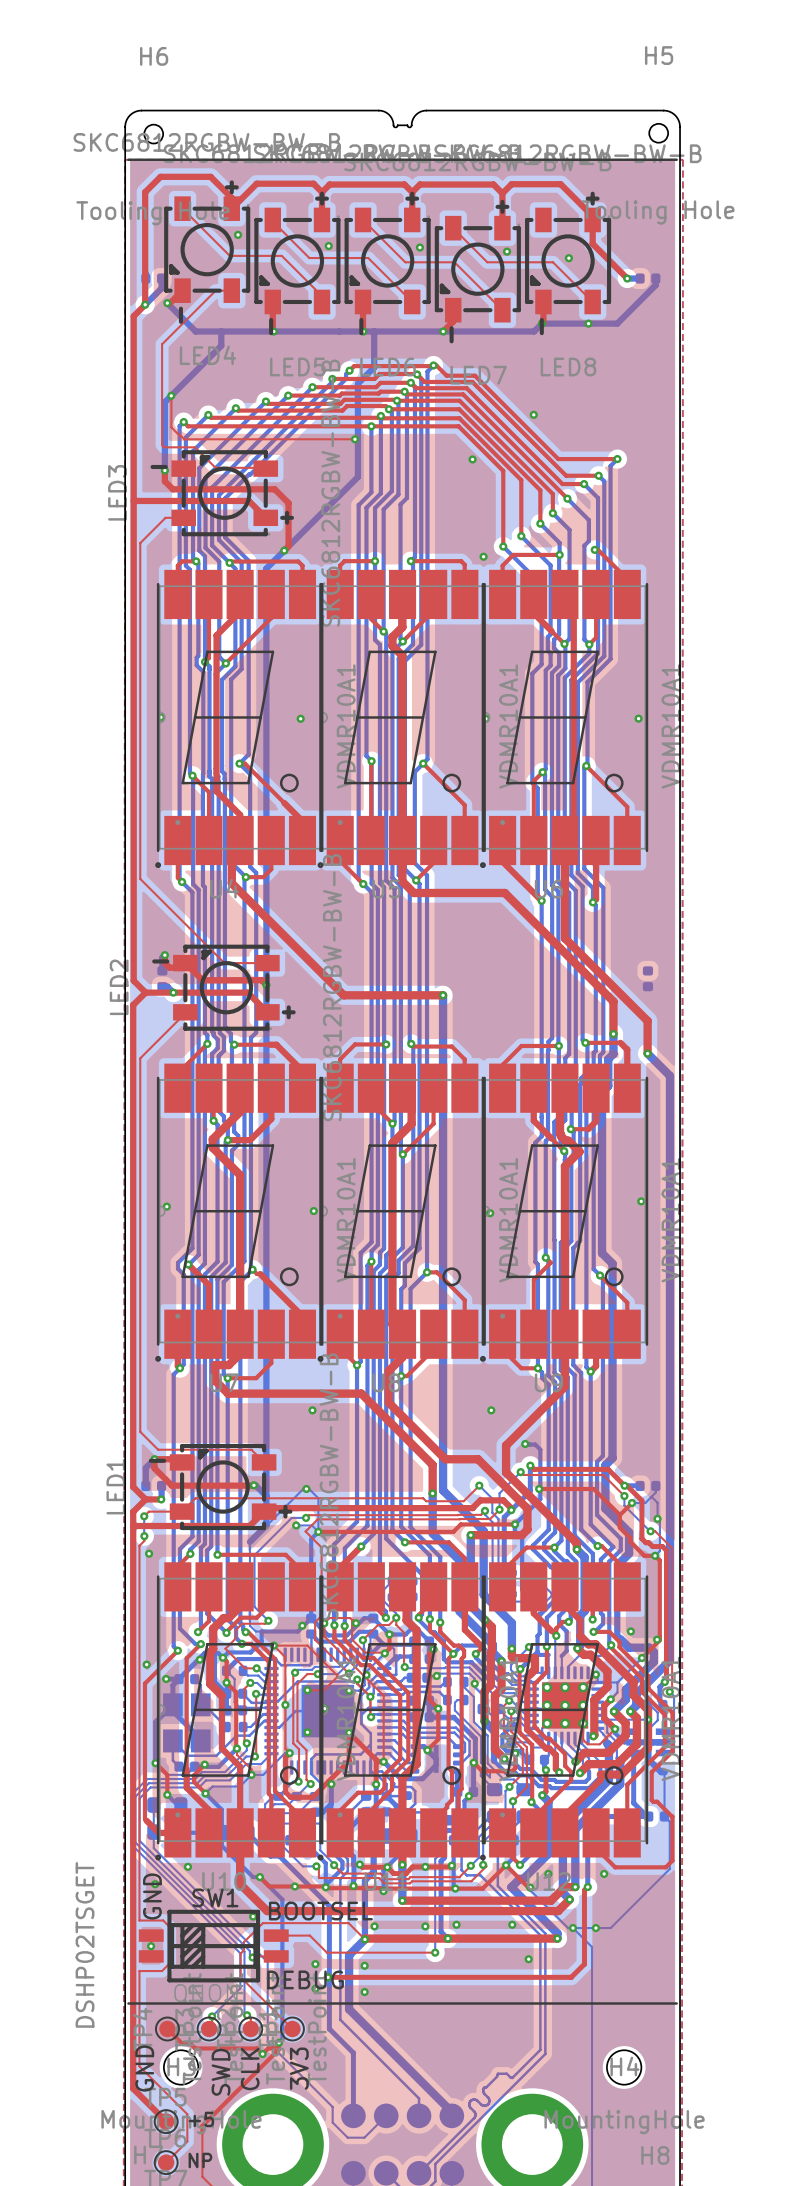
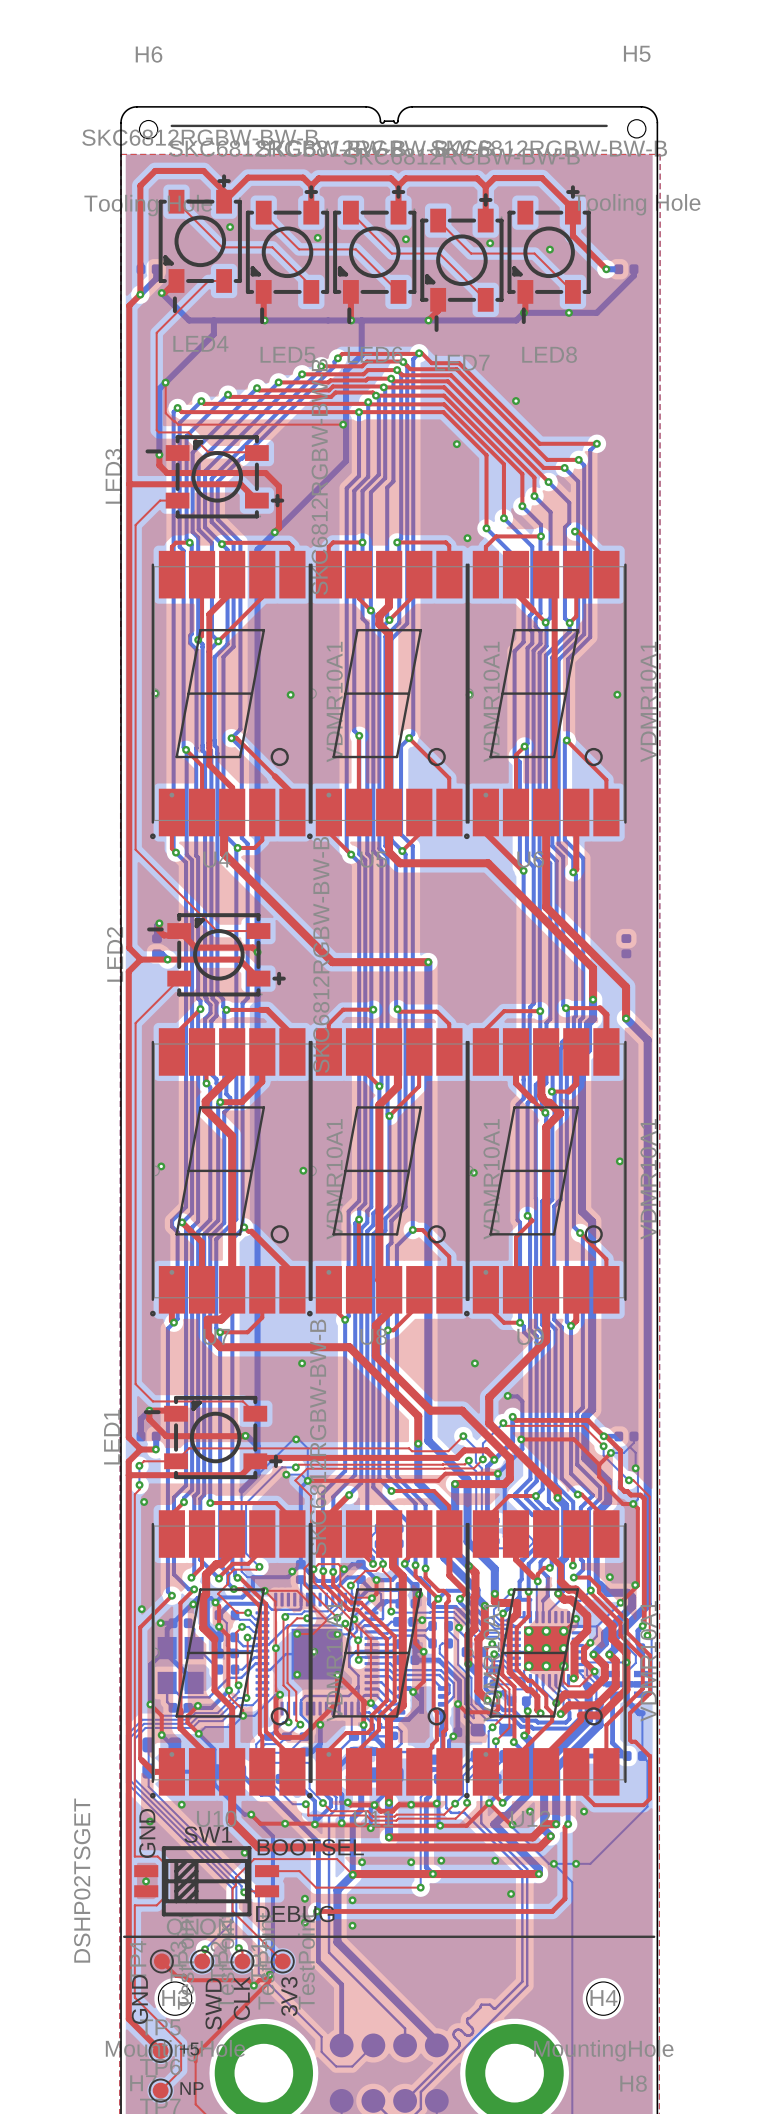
line: none -> (171, 125) (606, 125)
line: (128, 159) (676, 159) -> none

